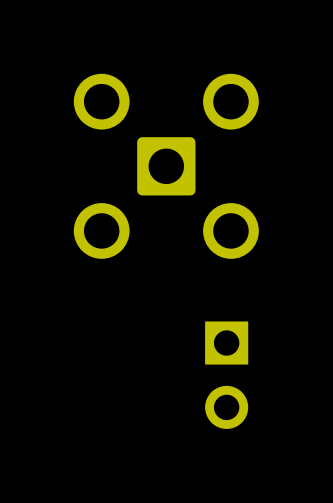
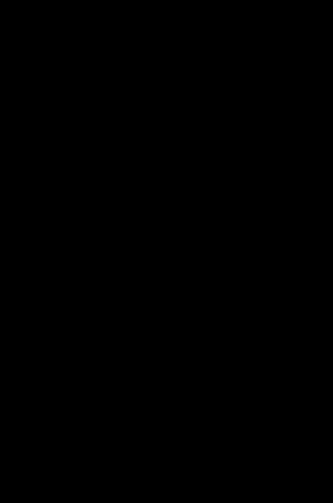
part: (166, 166) -> none
part: (226, 375) -> none

